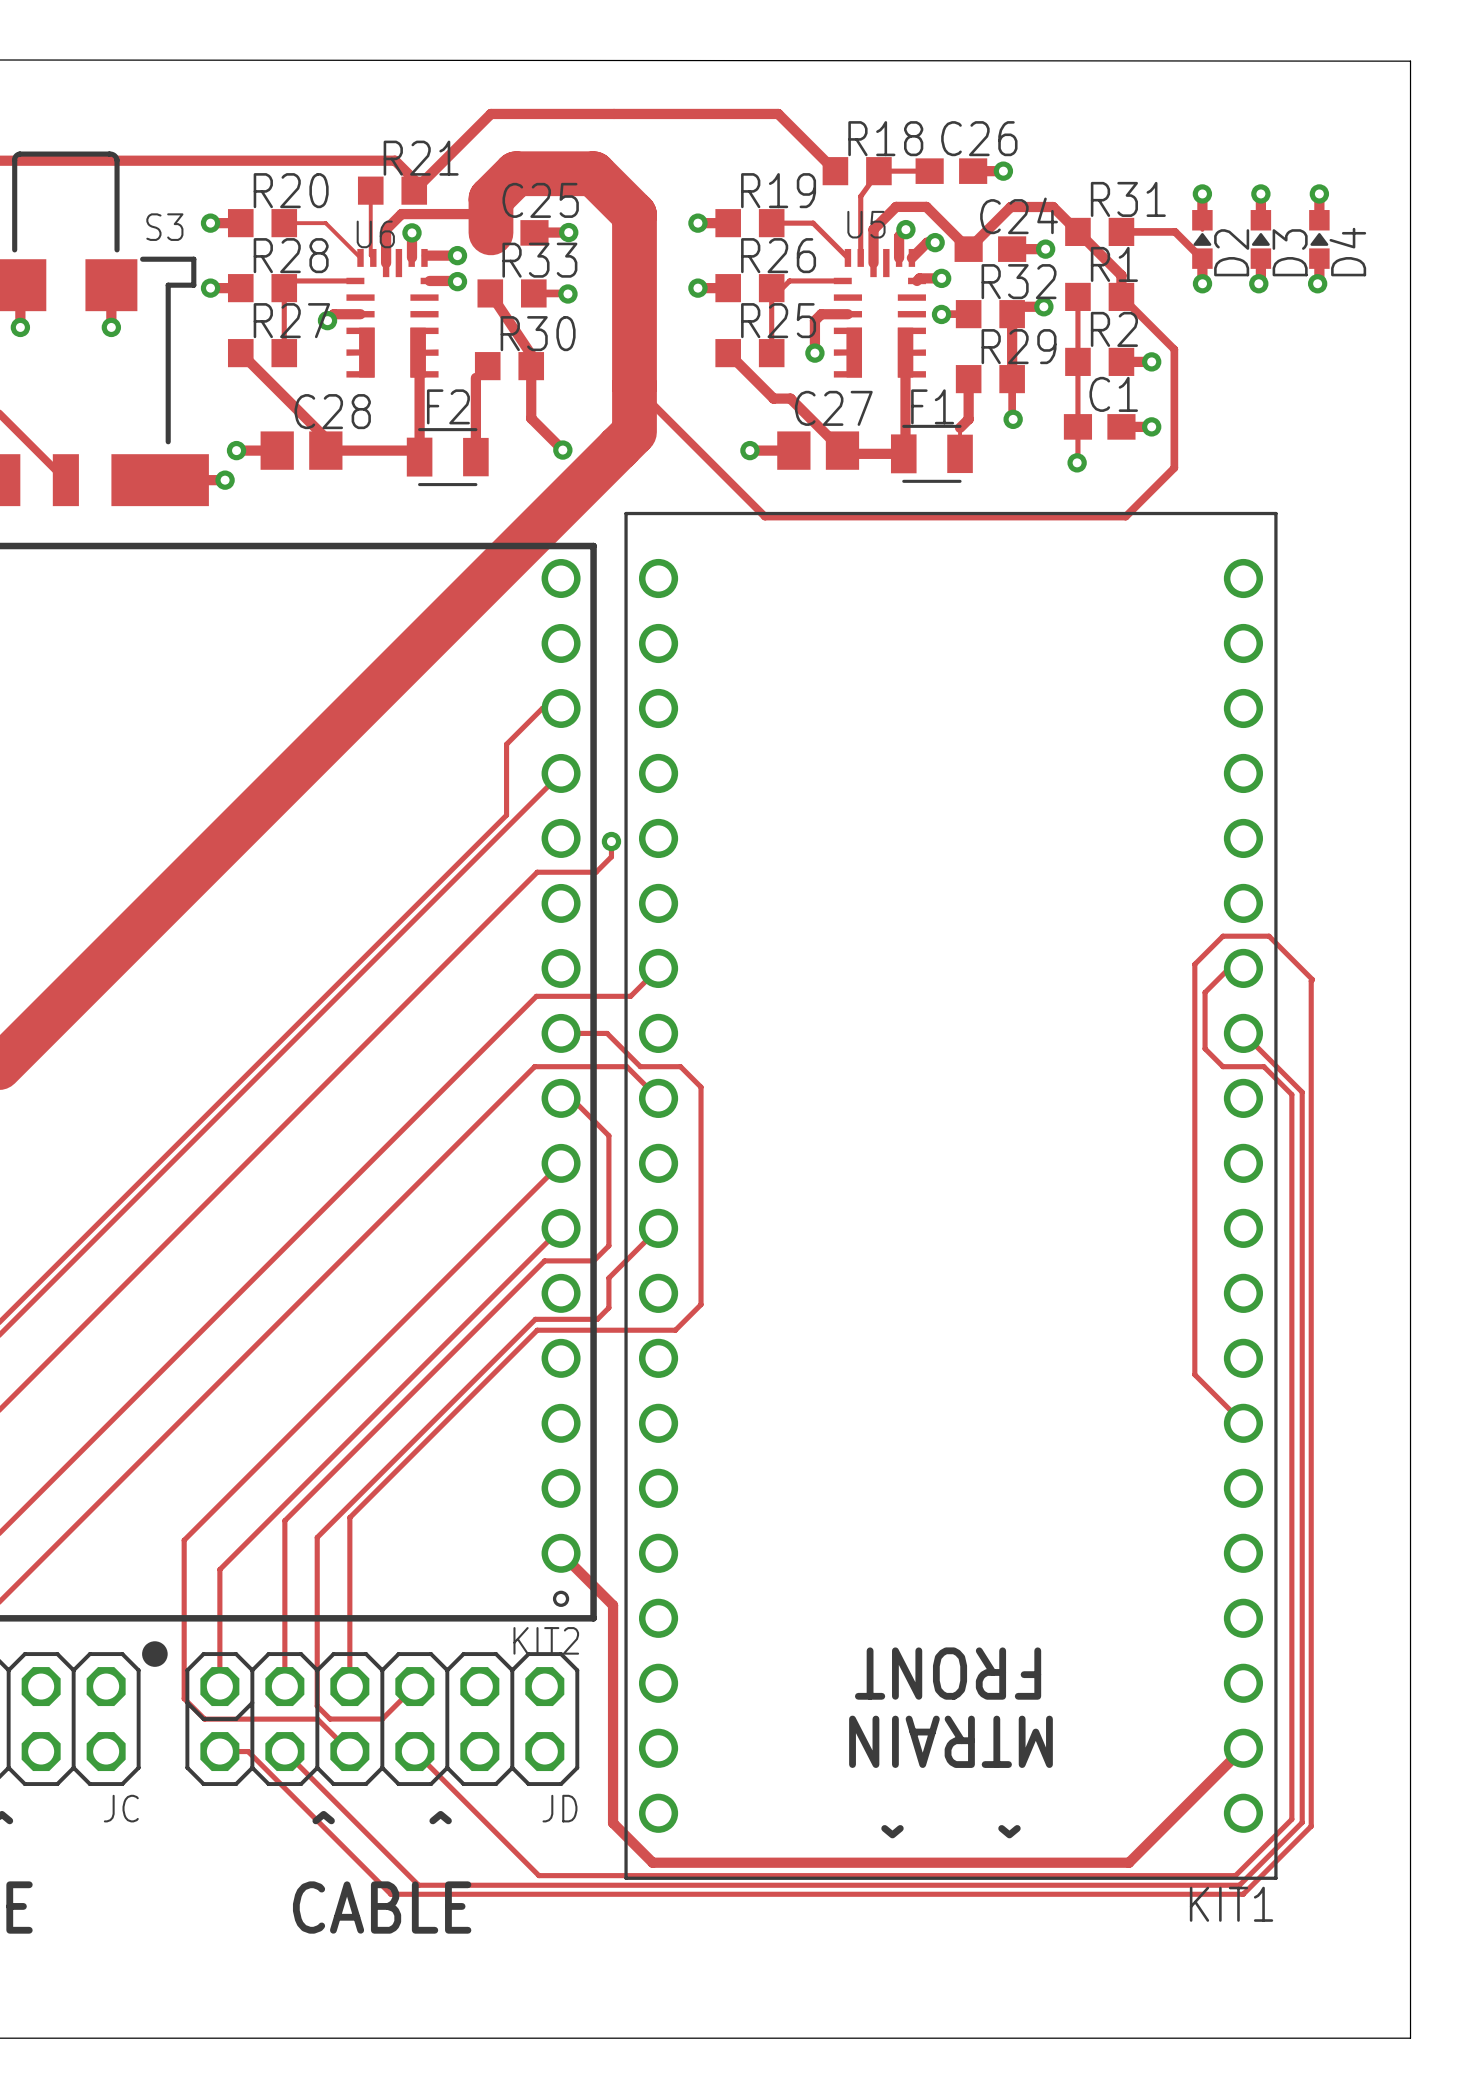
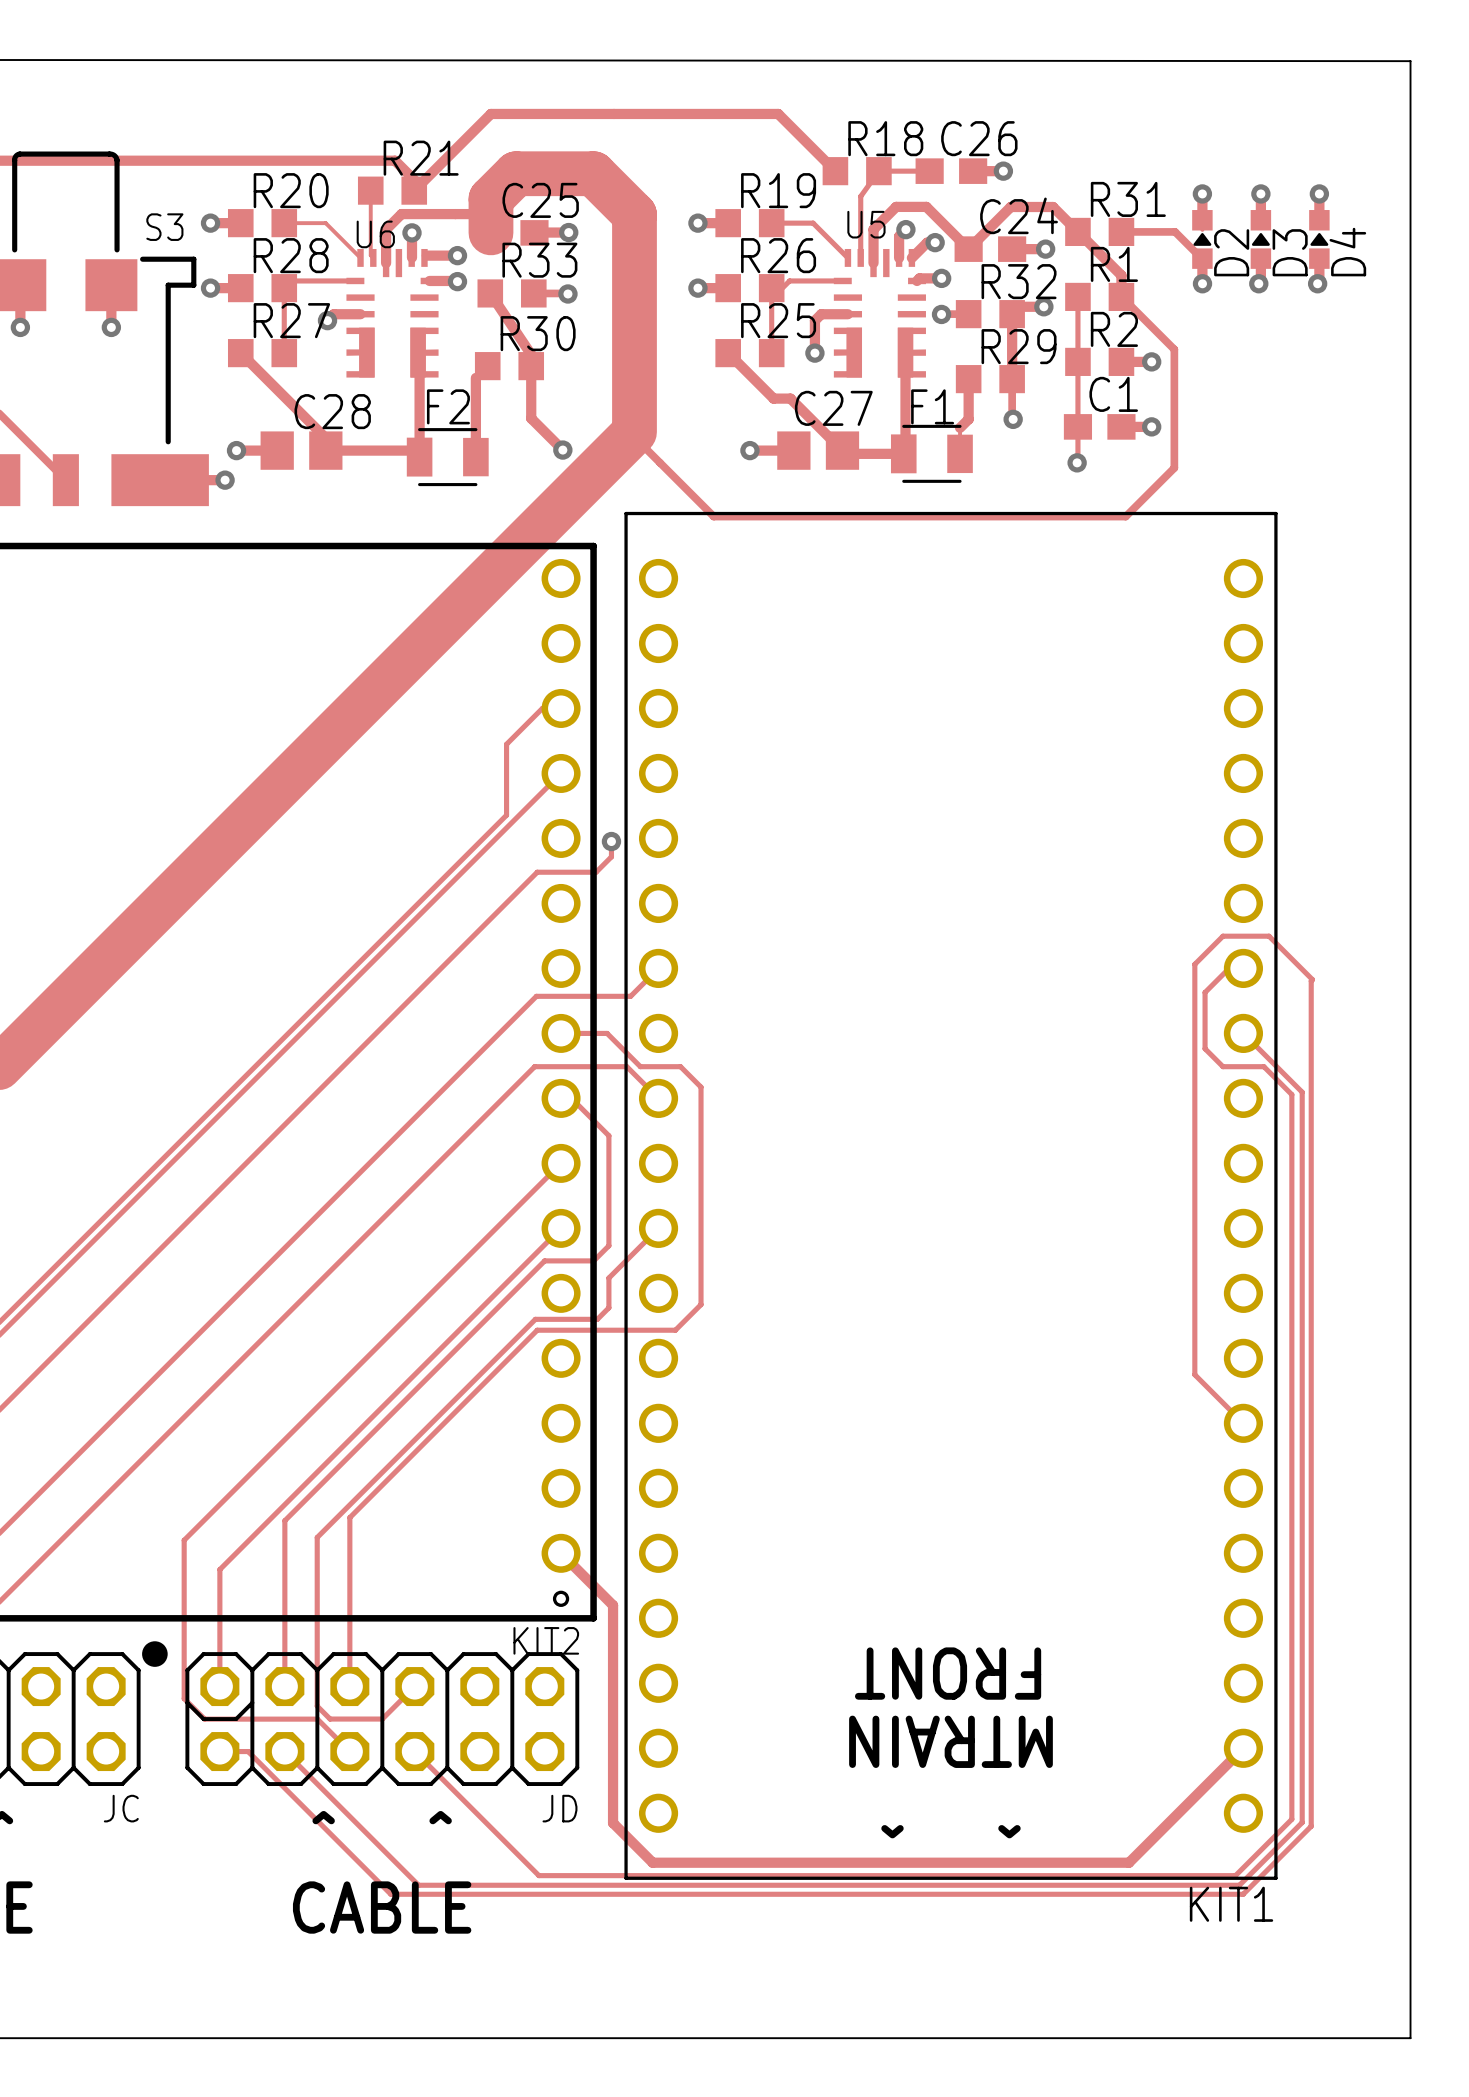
track: (634, 386) (764, 516) -> (631, 434) (713, 516) (764, 516)

